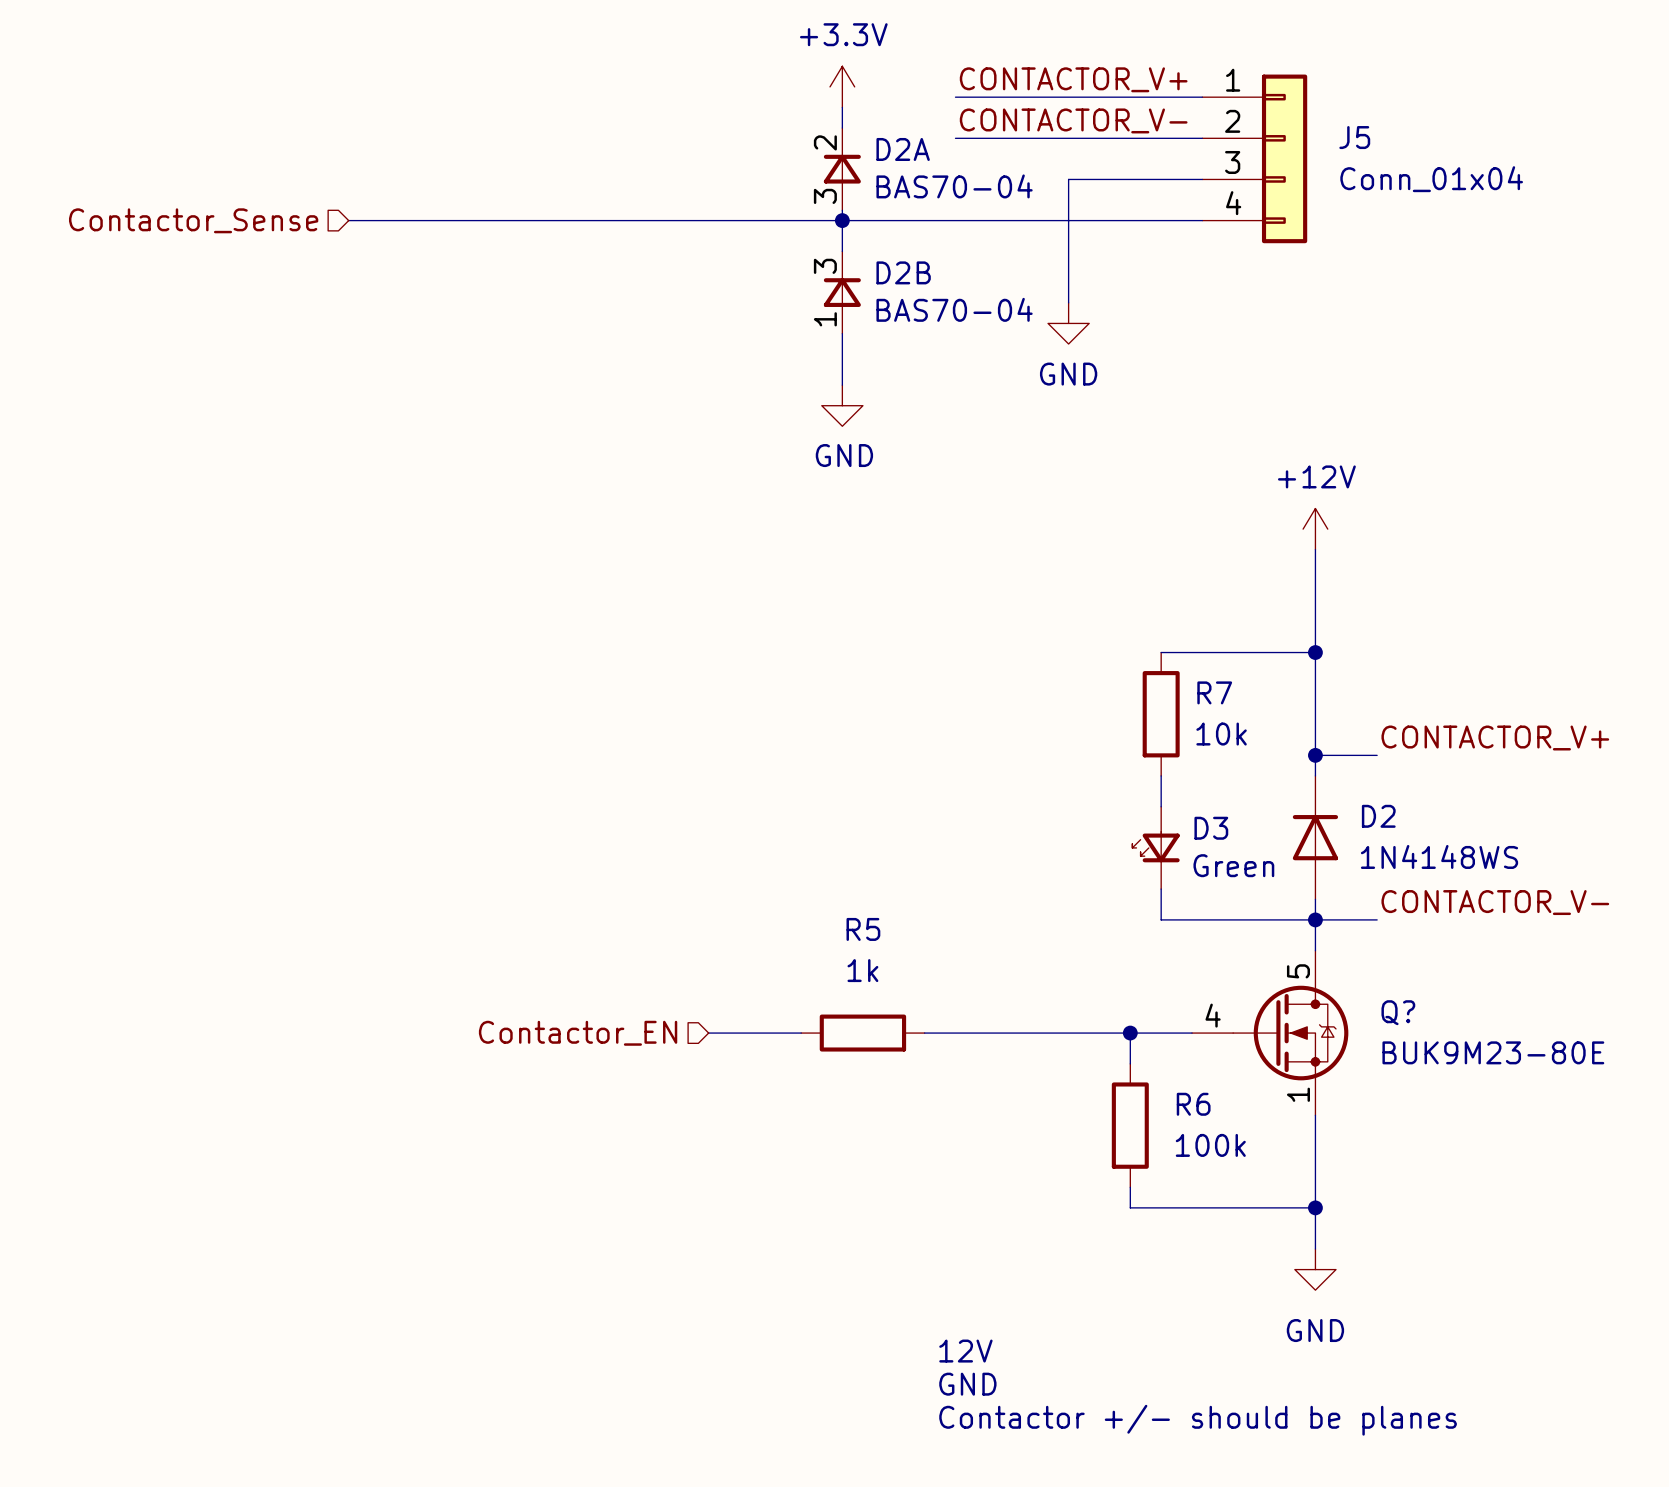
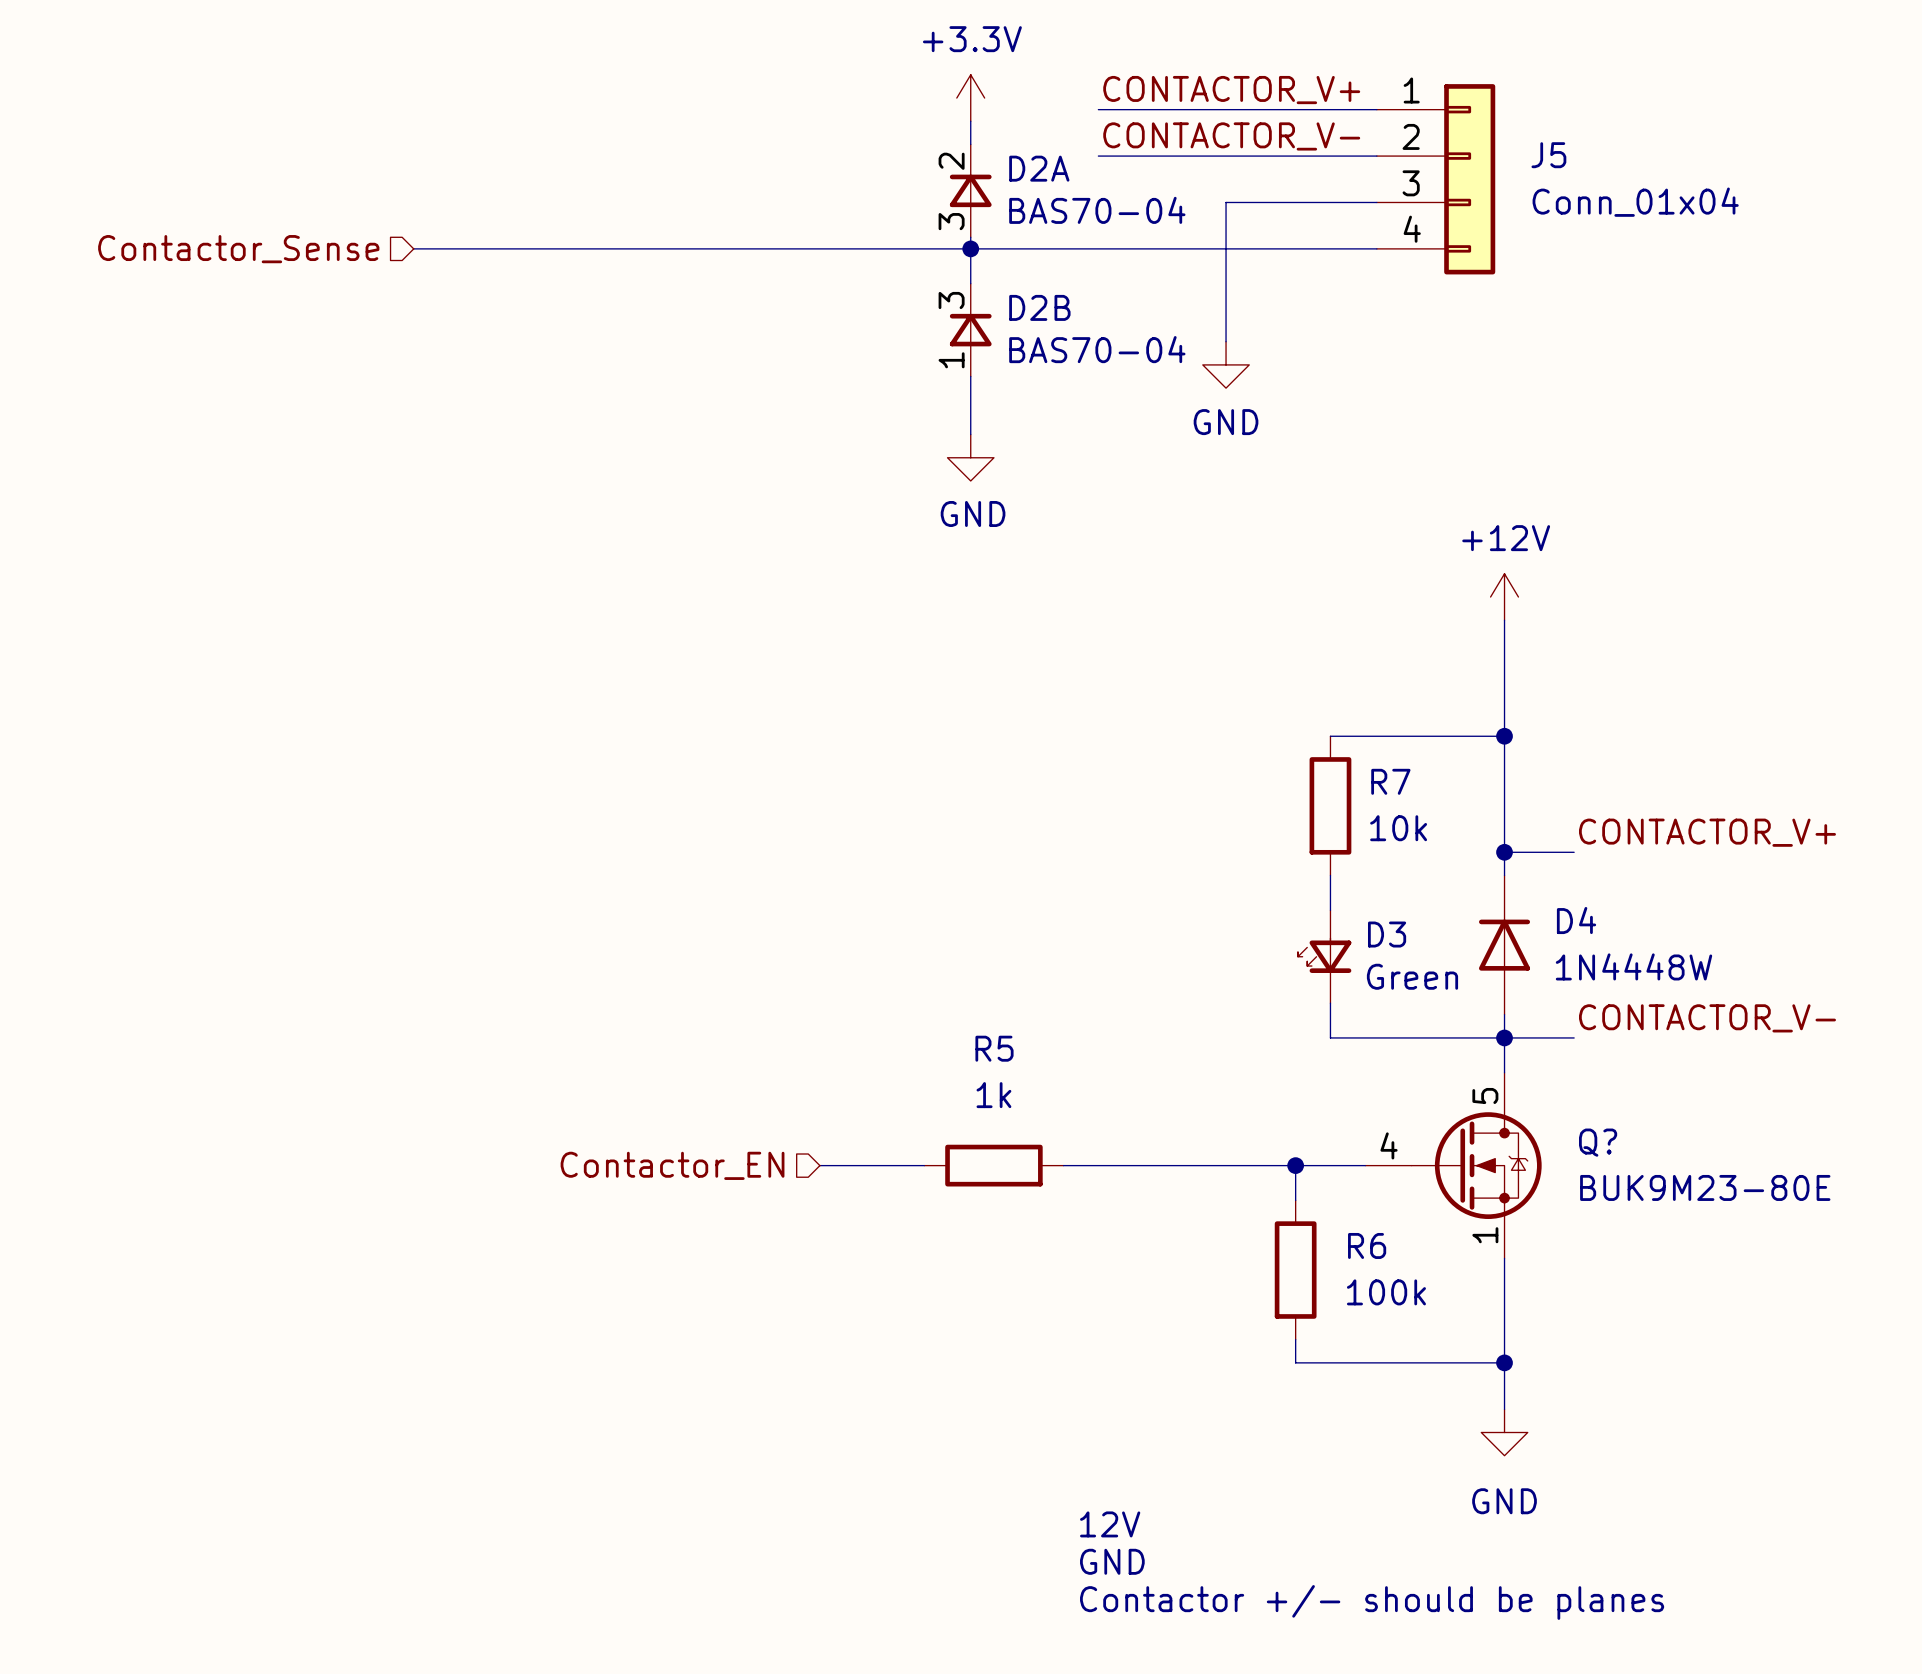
D2 name: D2 (1378, 816) -> D4 (1576, 920)
D2 value: 1N4148WS (1439, 856) -> 1N4448W (1633, 966)

